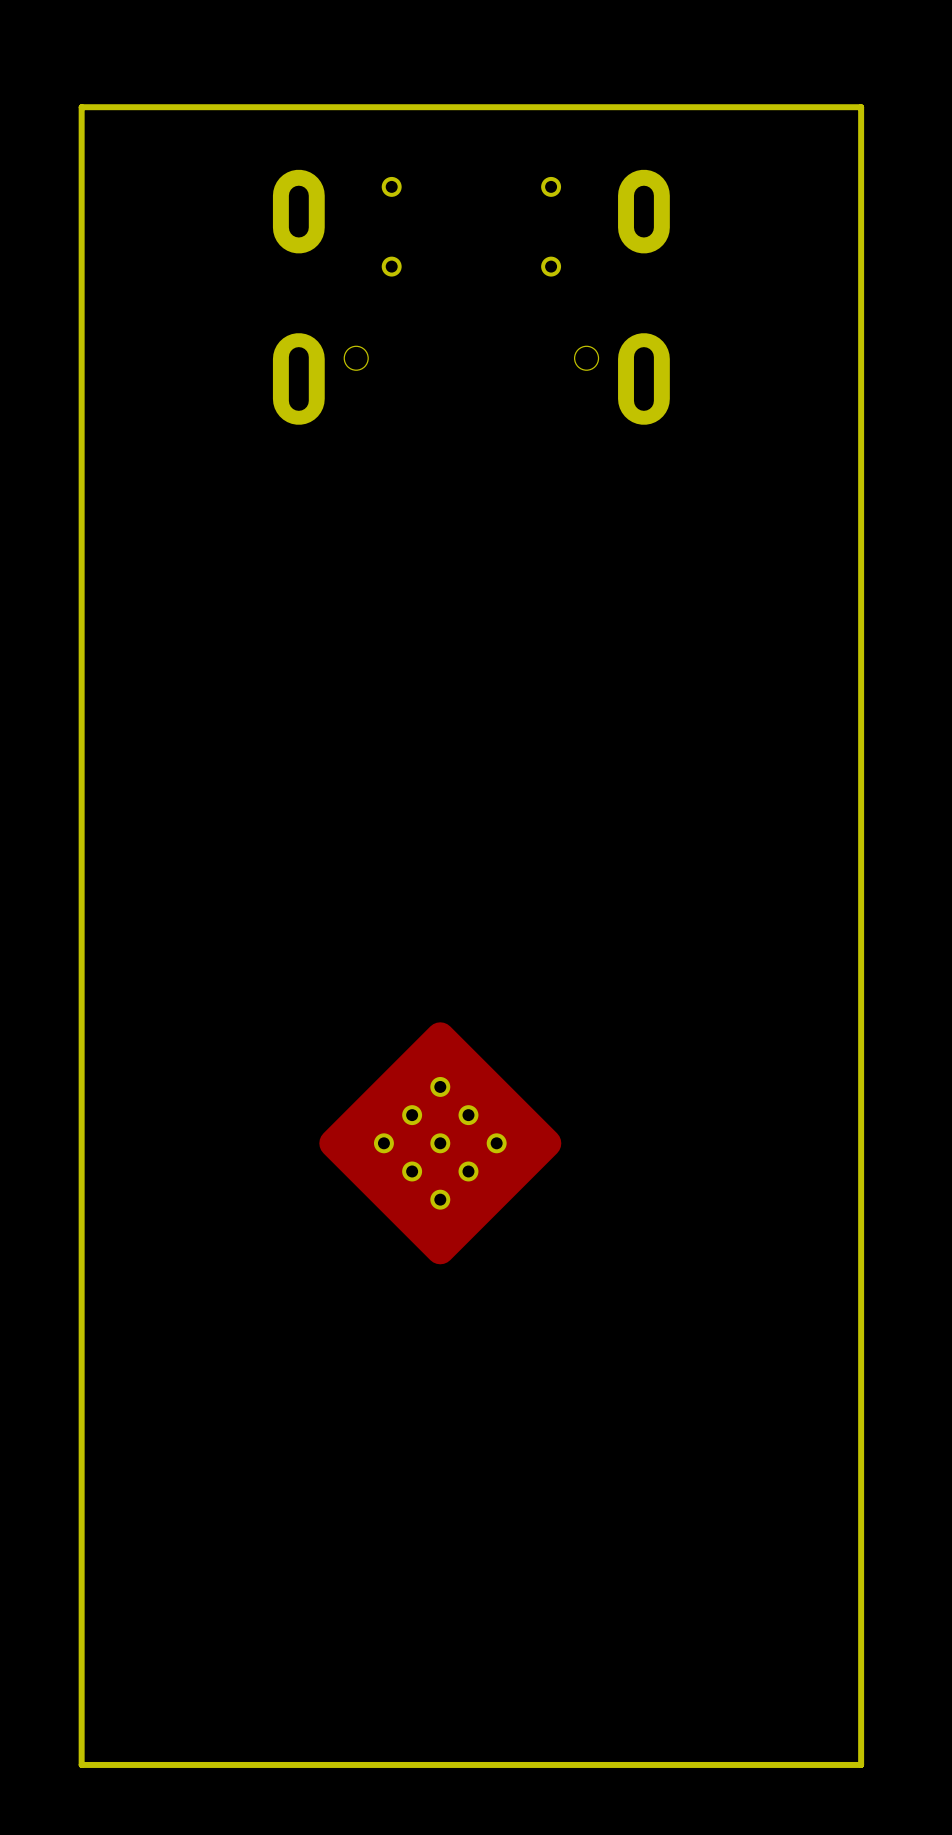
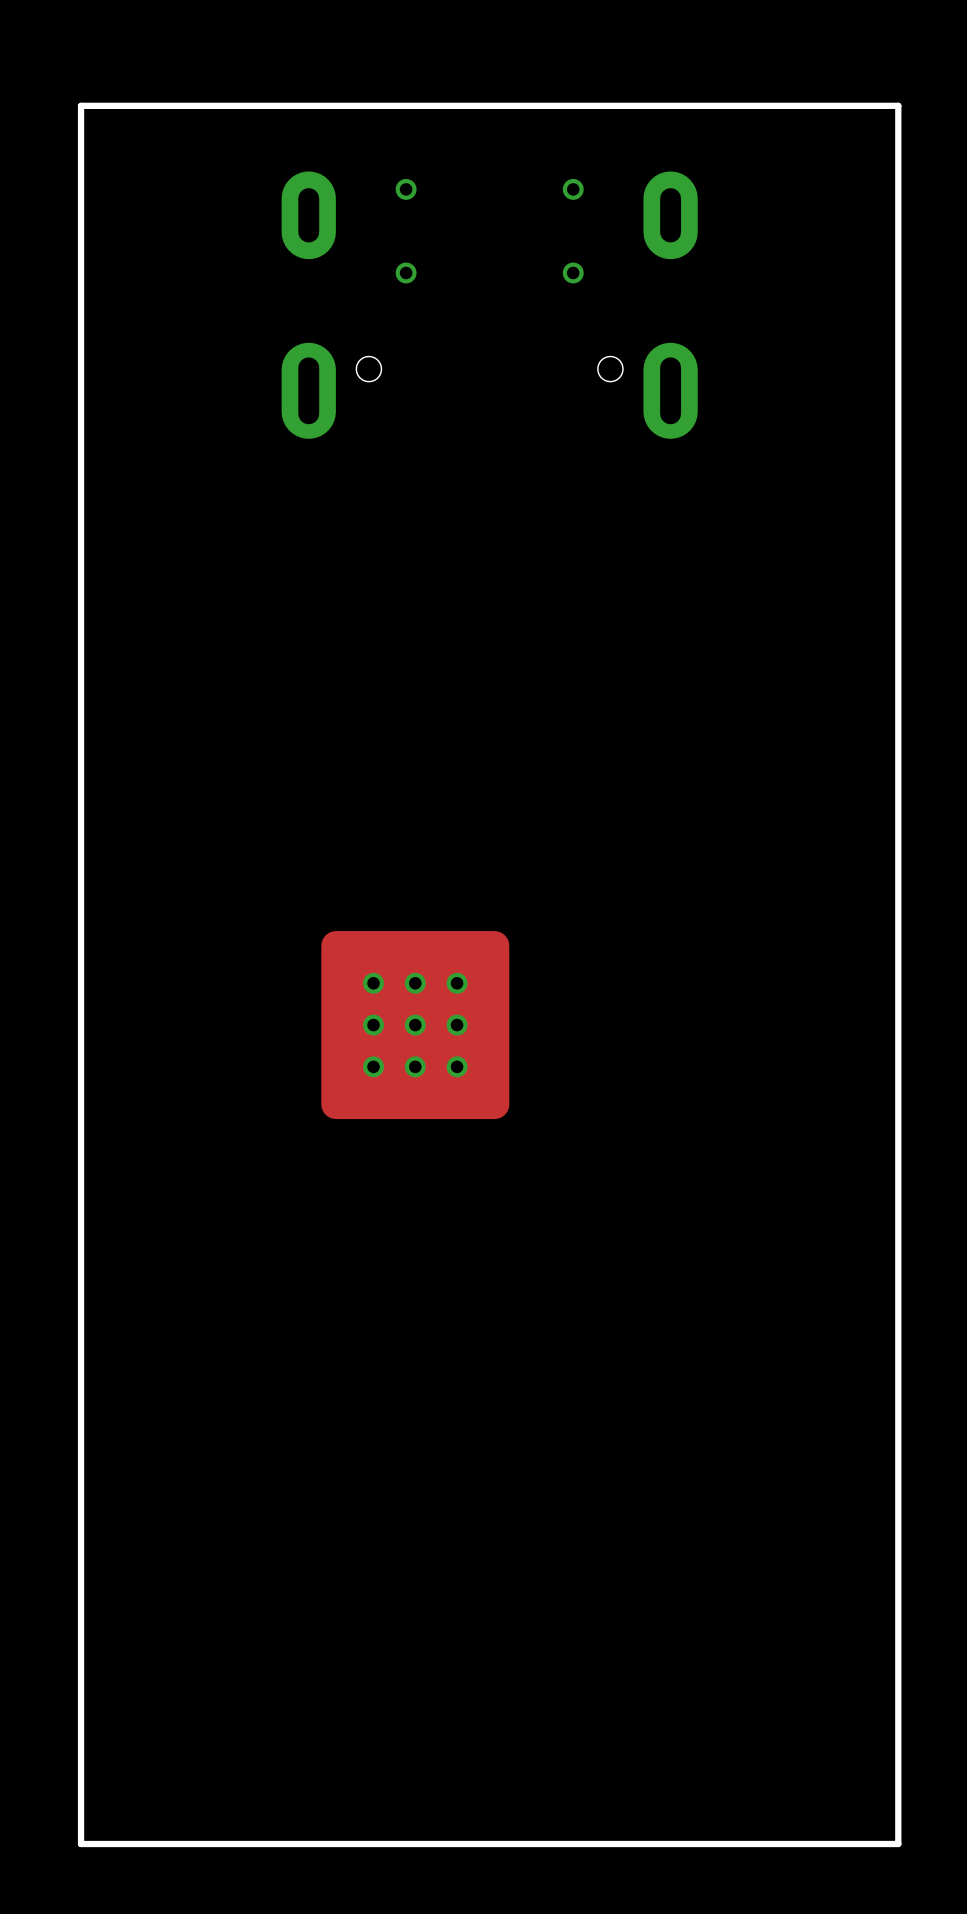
part: none -> (415, 1025)
part: (440, 1143) -> none

